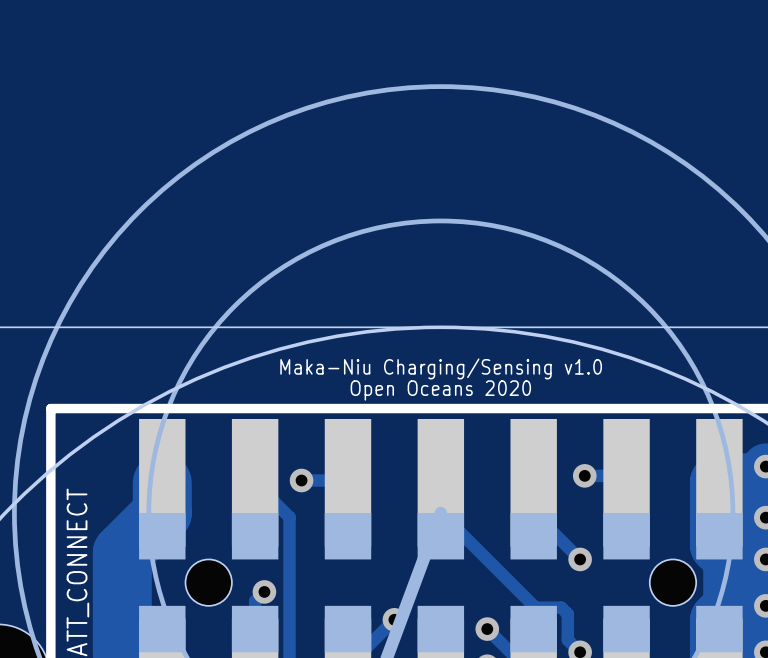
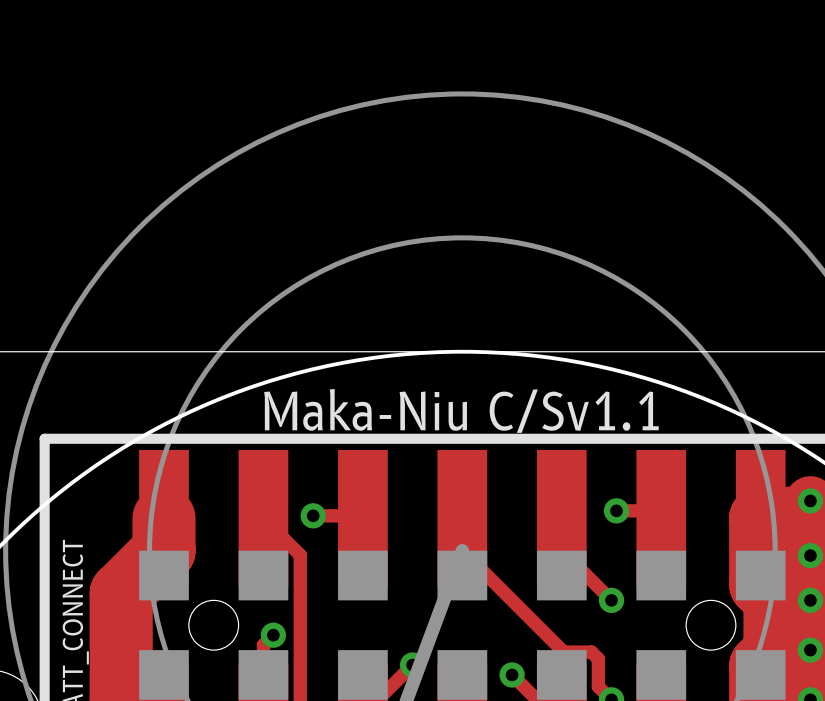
text: Maka-Niu Charging/Sensing v1.0 (441, 368) -> Maka-Niu C/Sv1.1 (461, 410)
text: Open Oceans 2020 (440, 390) -> none

